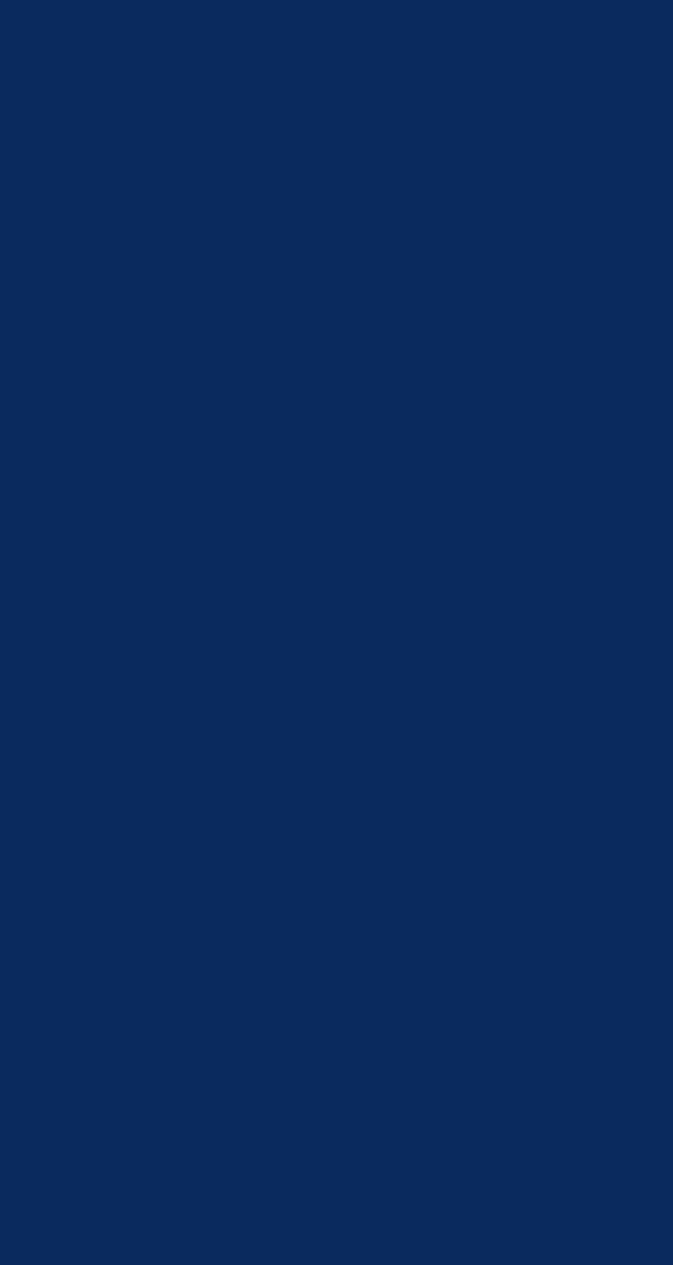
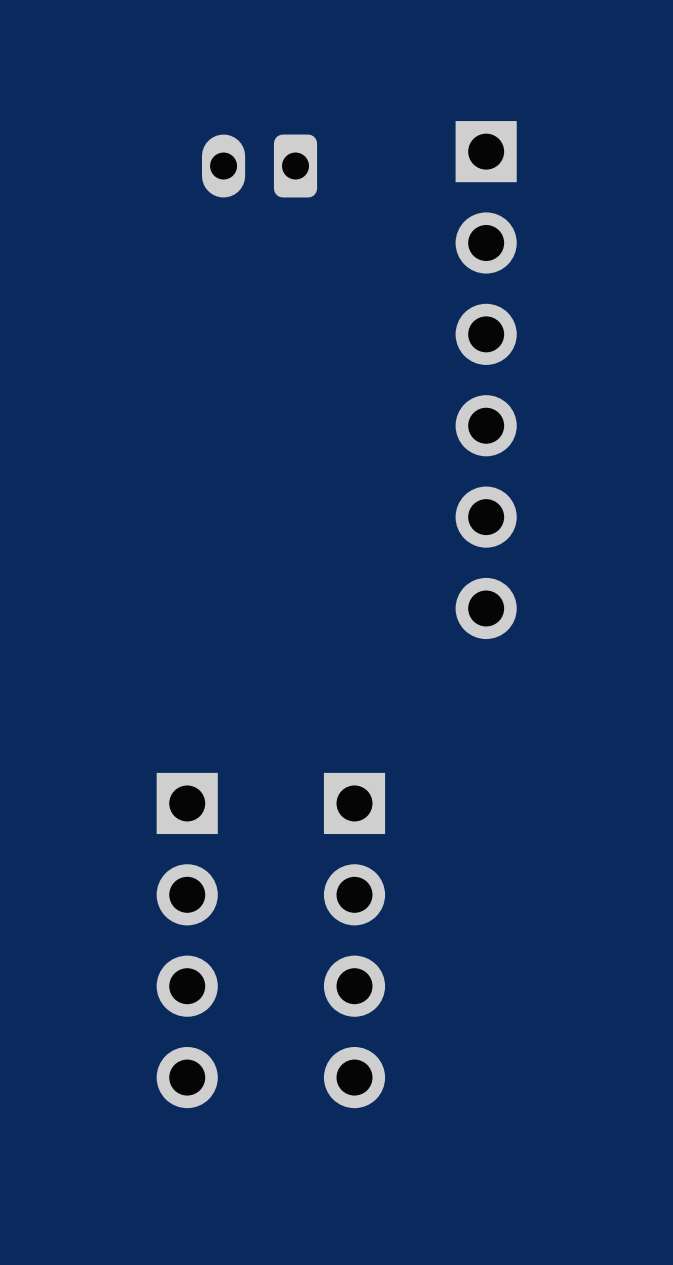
part: none -> (259, 166)
part: none -> (486, 380)
part: none -> (187, 940)
part: none -> (354, 940)

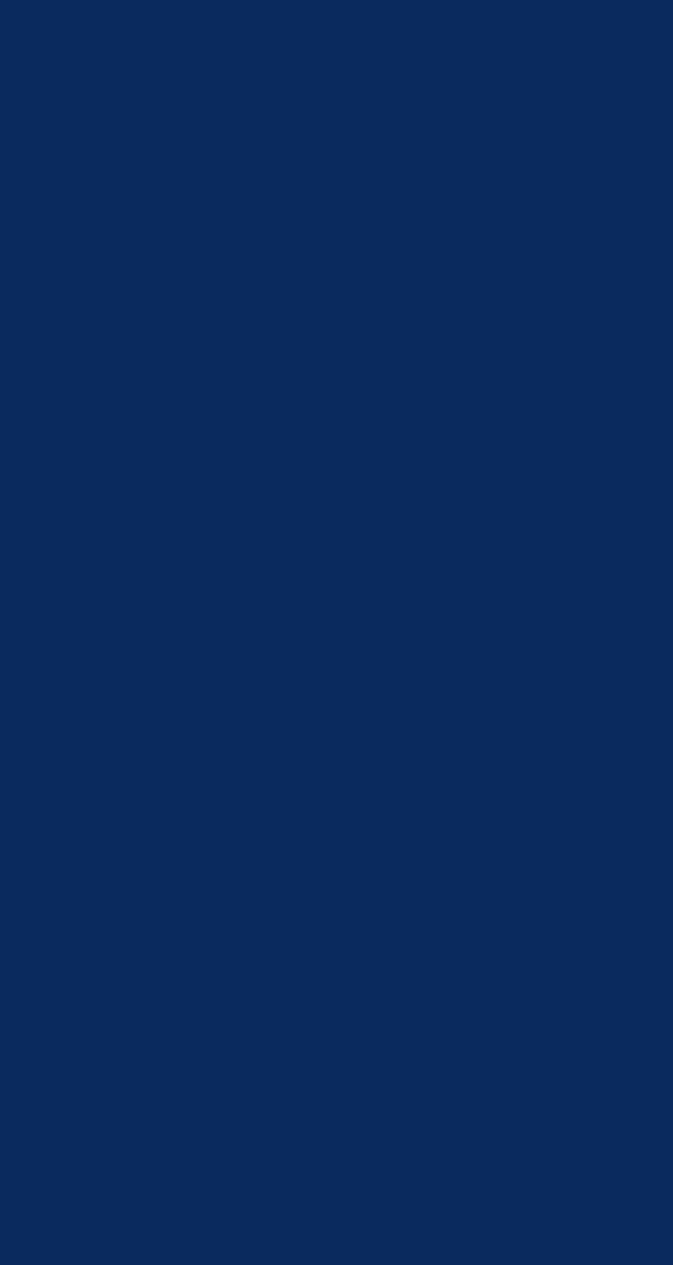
part: (259, 166) -> none
part: (486, 380) -> none
part: (187, 940) -> none
part: (354, 940) -> none

